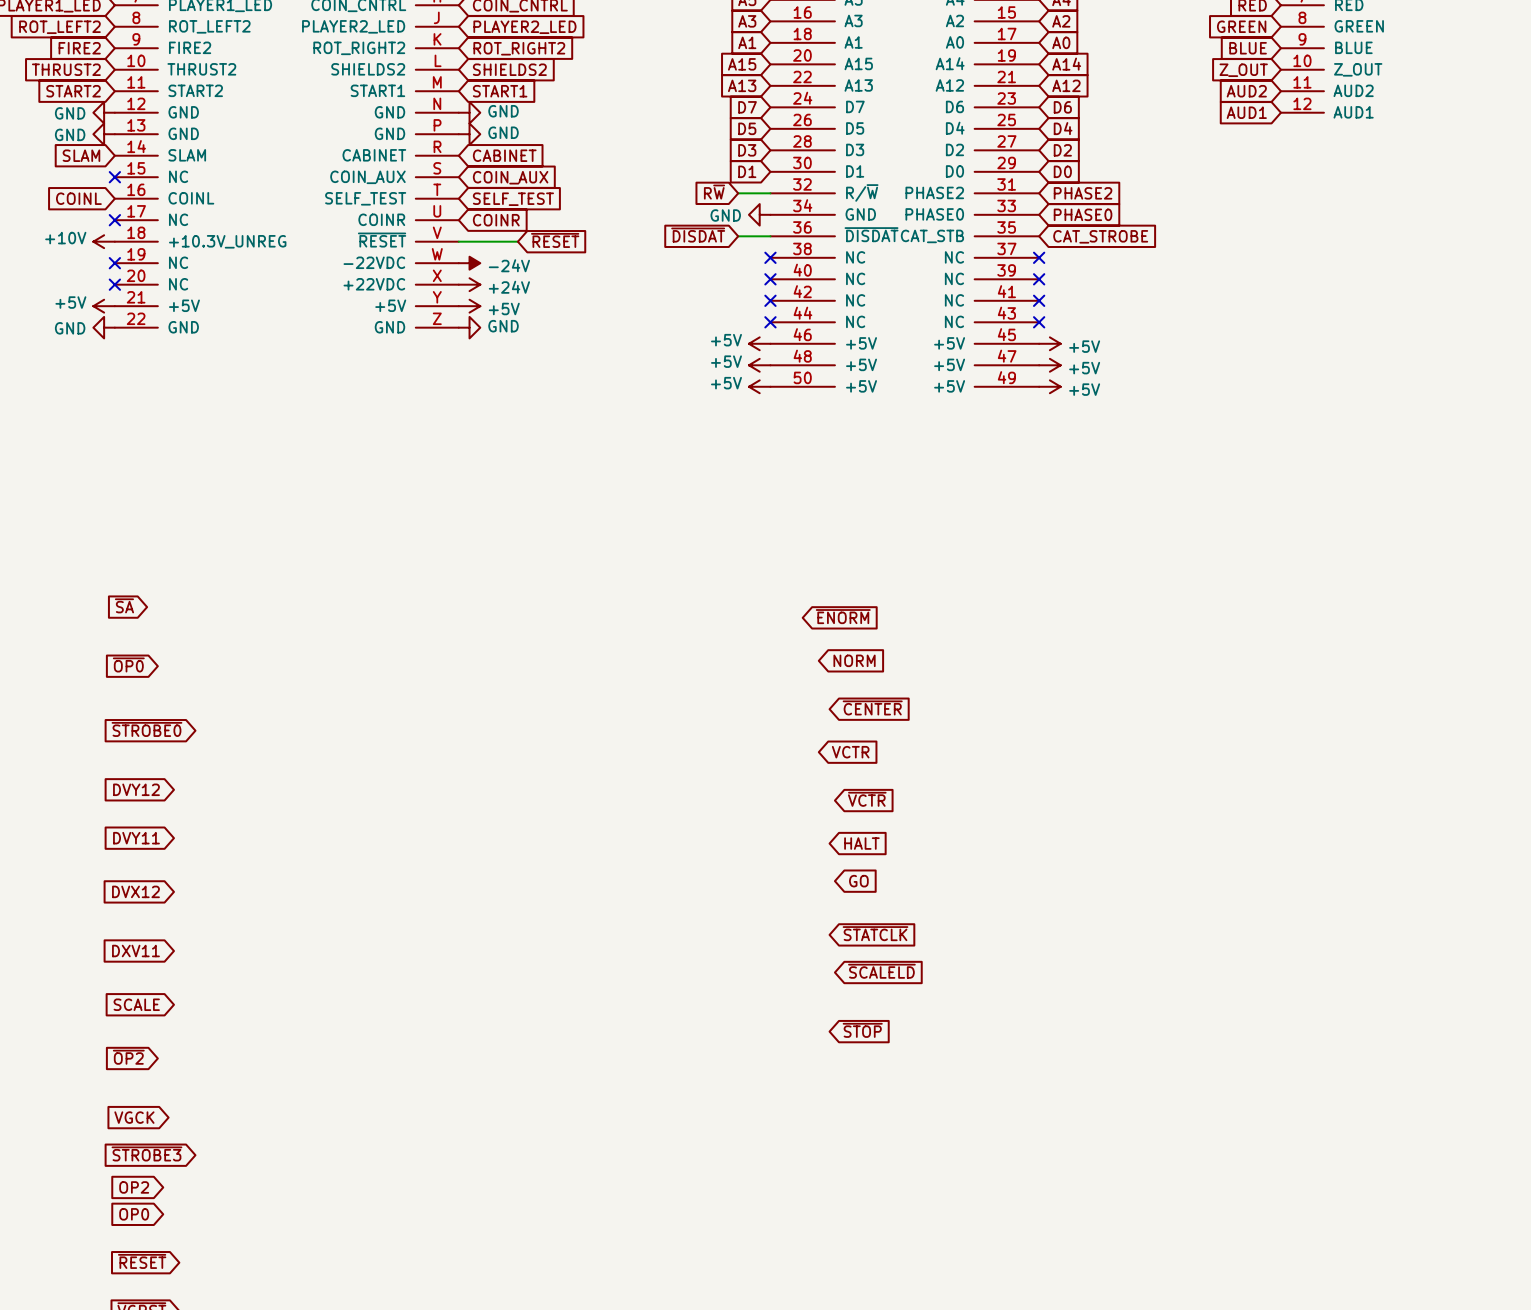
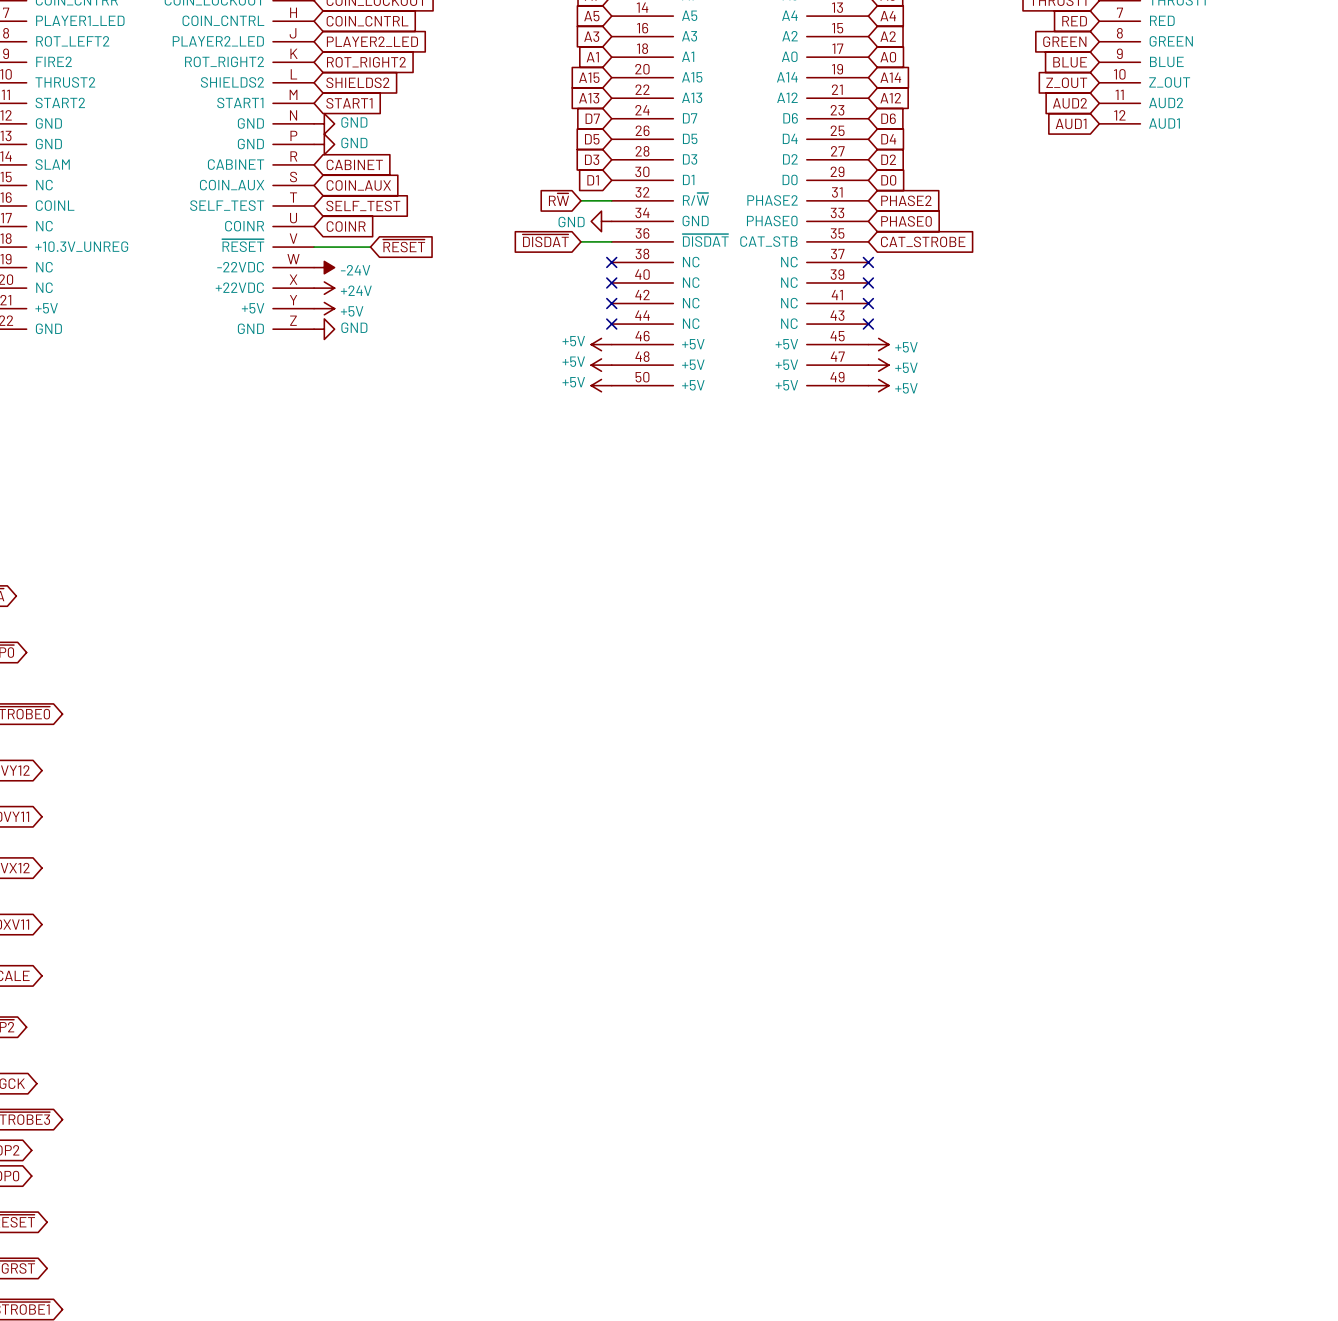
global label: ~{ENORM} (843, 616) -> none
global label: NORM (854, 660) -> none
global label: ~{CENTER} (872, 707) -> none
global label: VCTR (850, 752) -> none
global label: ~{VCTR} (867, 799) -> none
global label: HALT (861, 843) -> none
global label: GO (858, 881) -> none
global label: ~{STATCLK} (875, 933) -> none
global label: ~{SCALELD} (881, 971) -> none
global label: ~{STOP} (862, 1030) -> none

